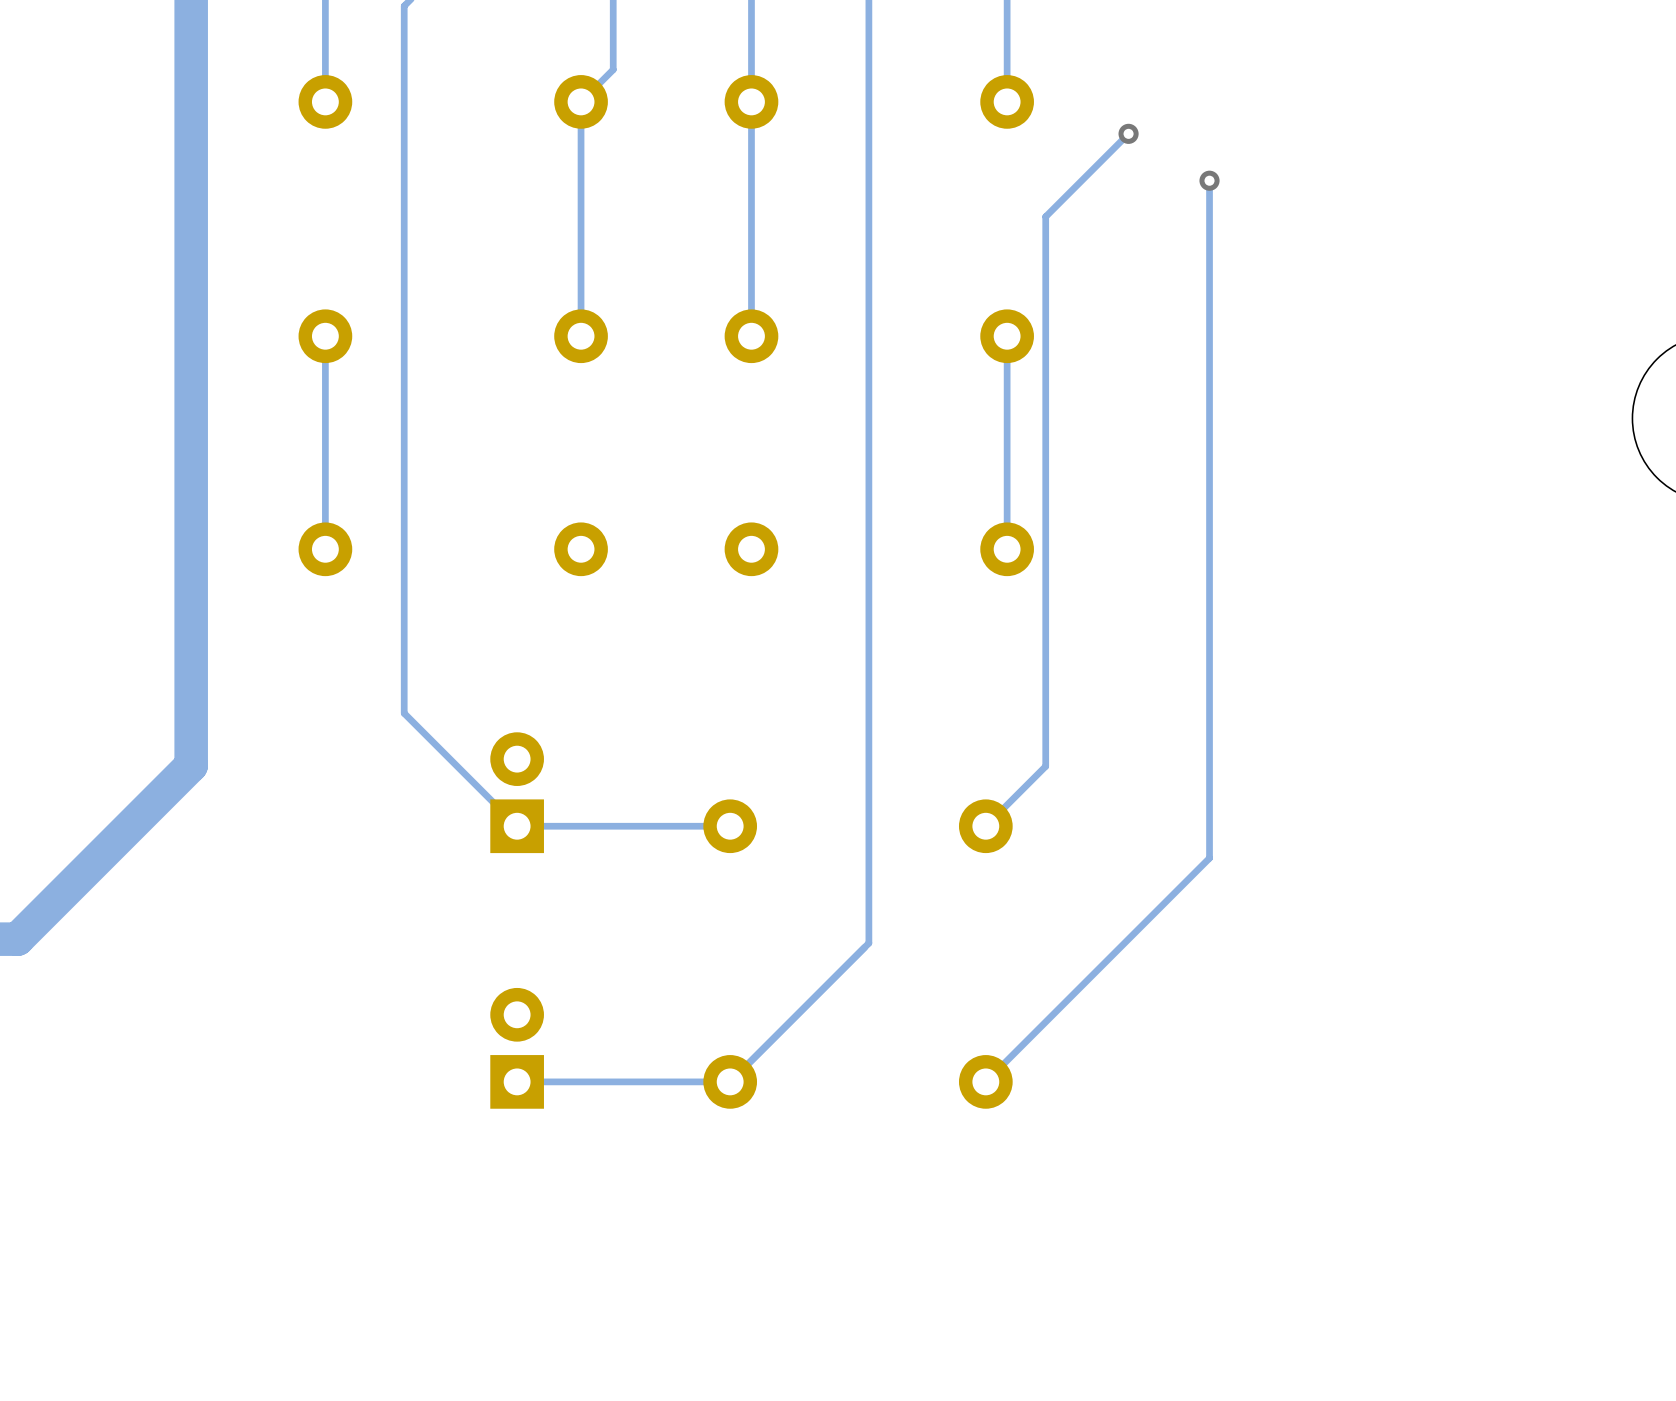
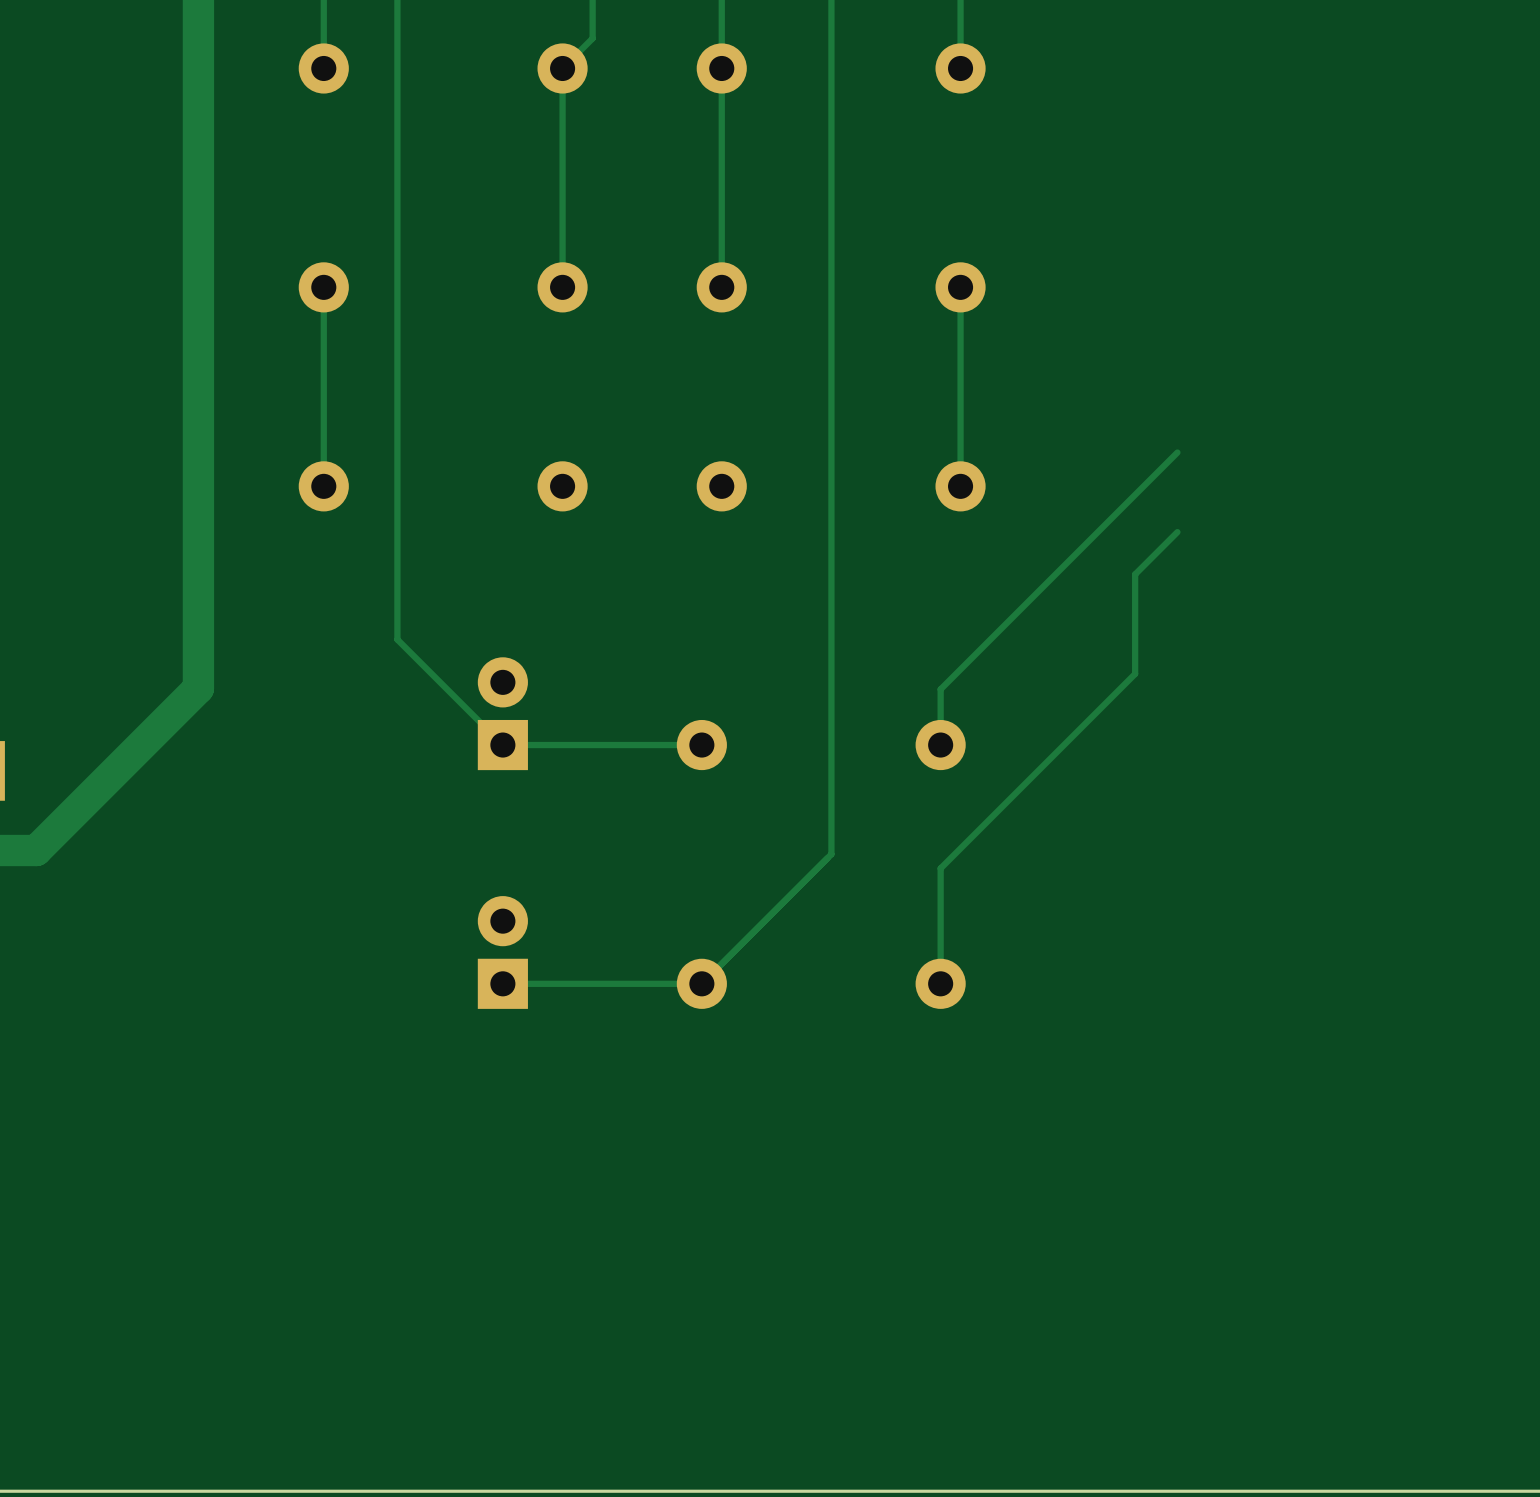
track: (1128, 133) (1045, 216) (1045, 766) (985, 826) -> (1177, 452) (940, 689) (940, 745)
via: (1128, 133) -> none
track: (1209, 180) (1209, 858) (985, 1081) -> (1177, 532) (1135, 574) (1135, 673) (940, 868) (940, 983)
via: (1209, 180) -> none

